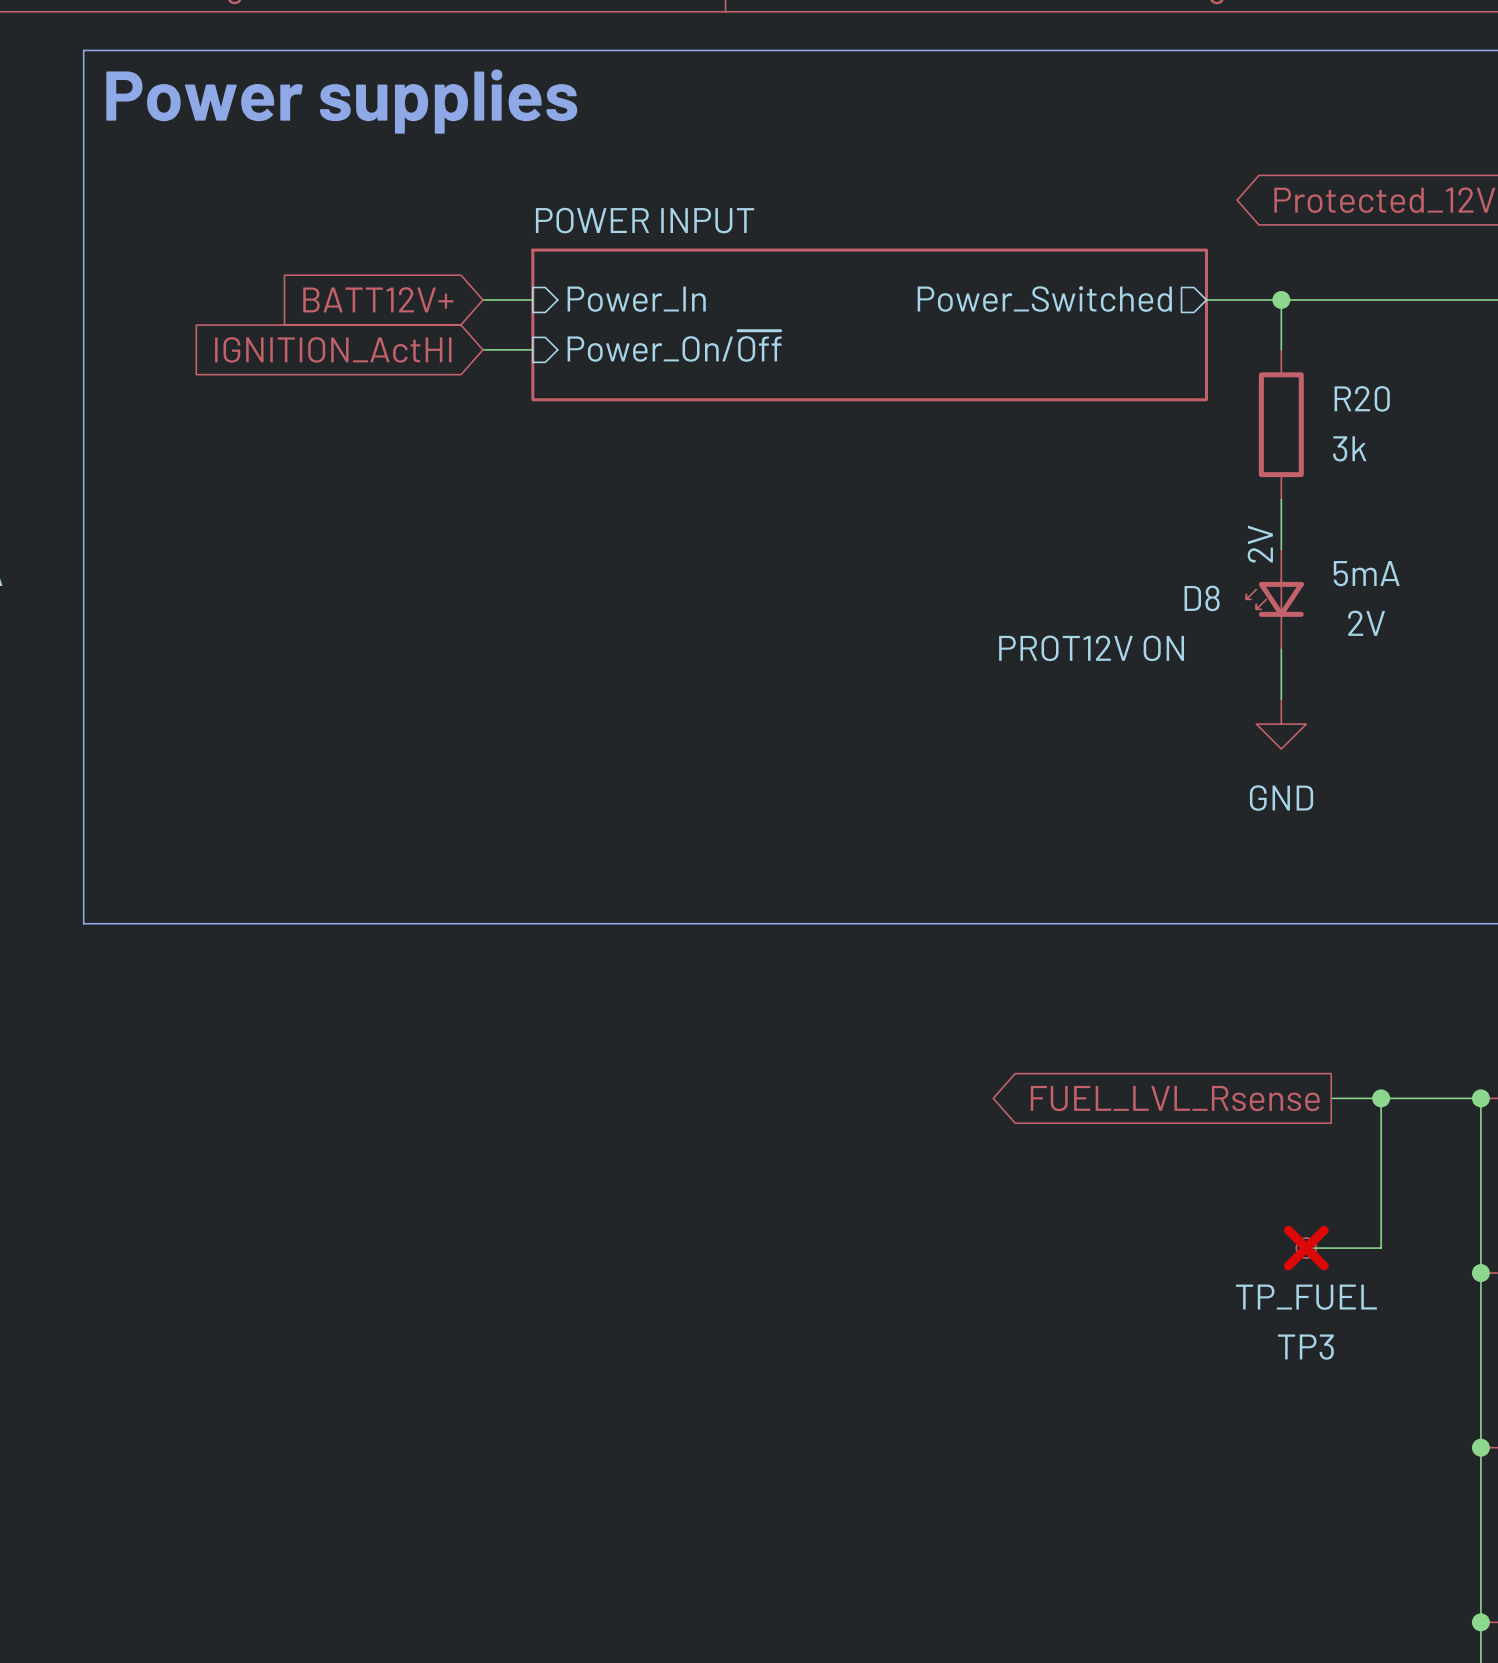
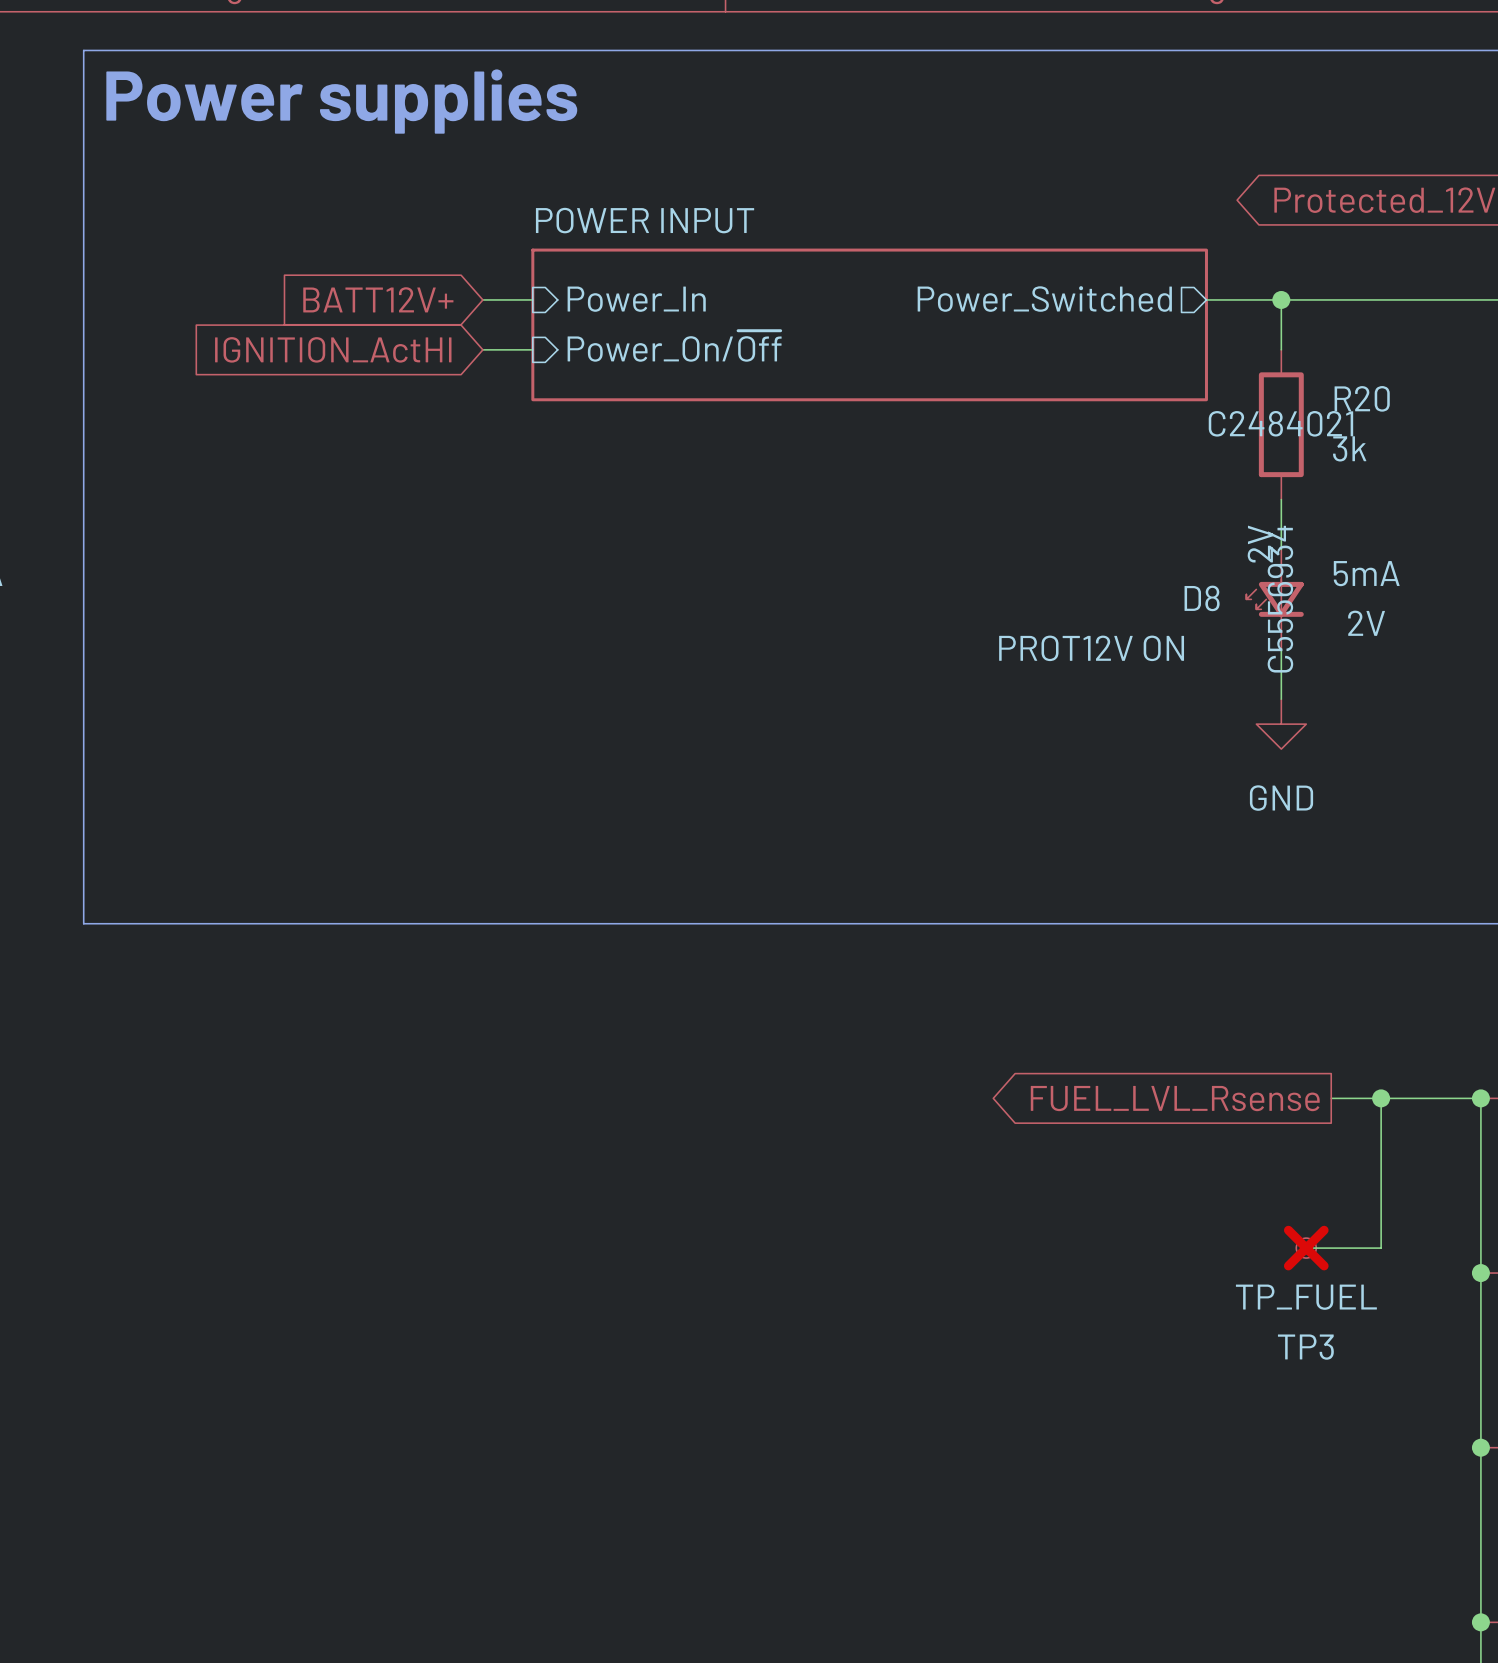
R20 text: none -> C2484021 (1280, 423)
D8 text: none -> C5556934 (1280, 599)

